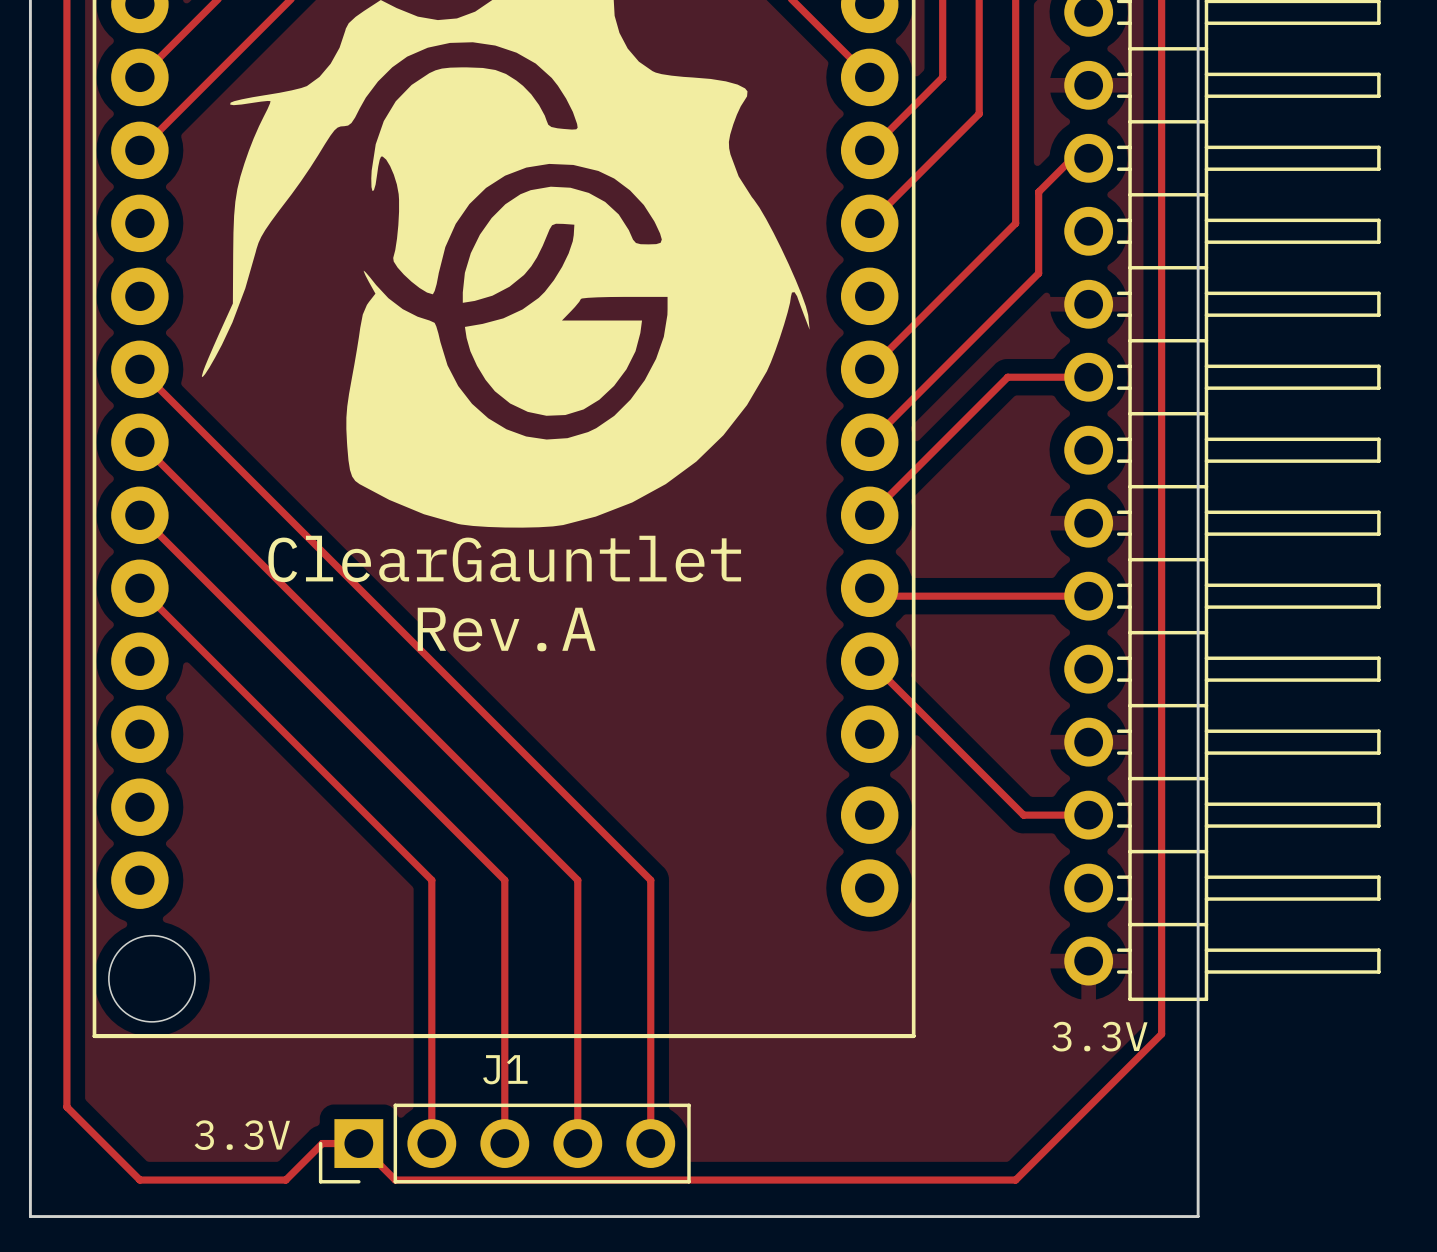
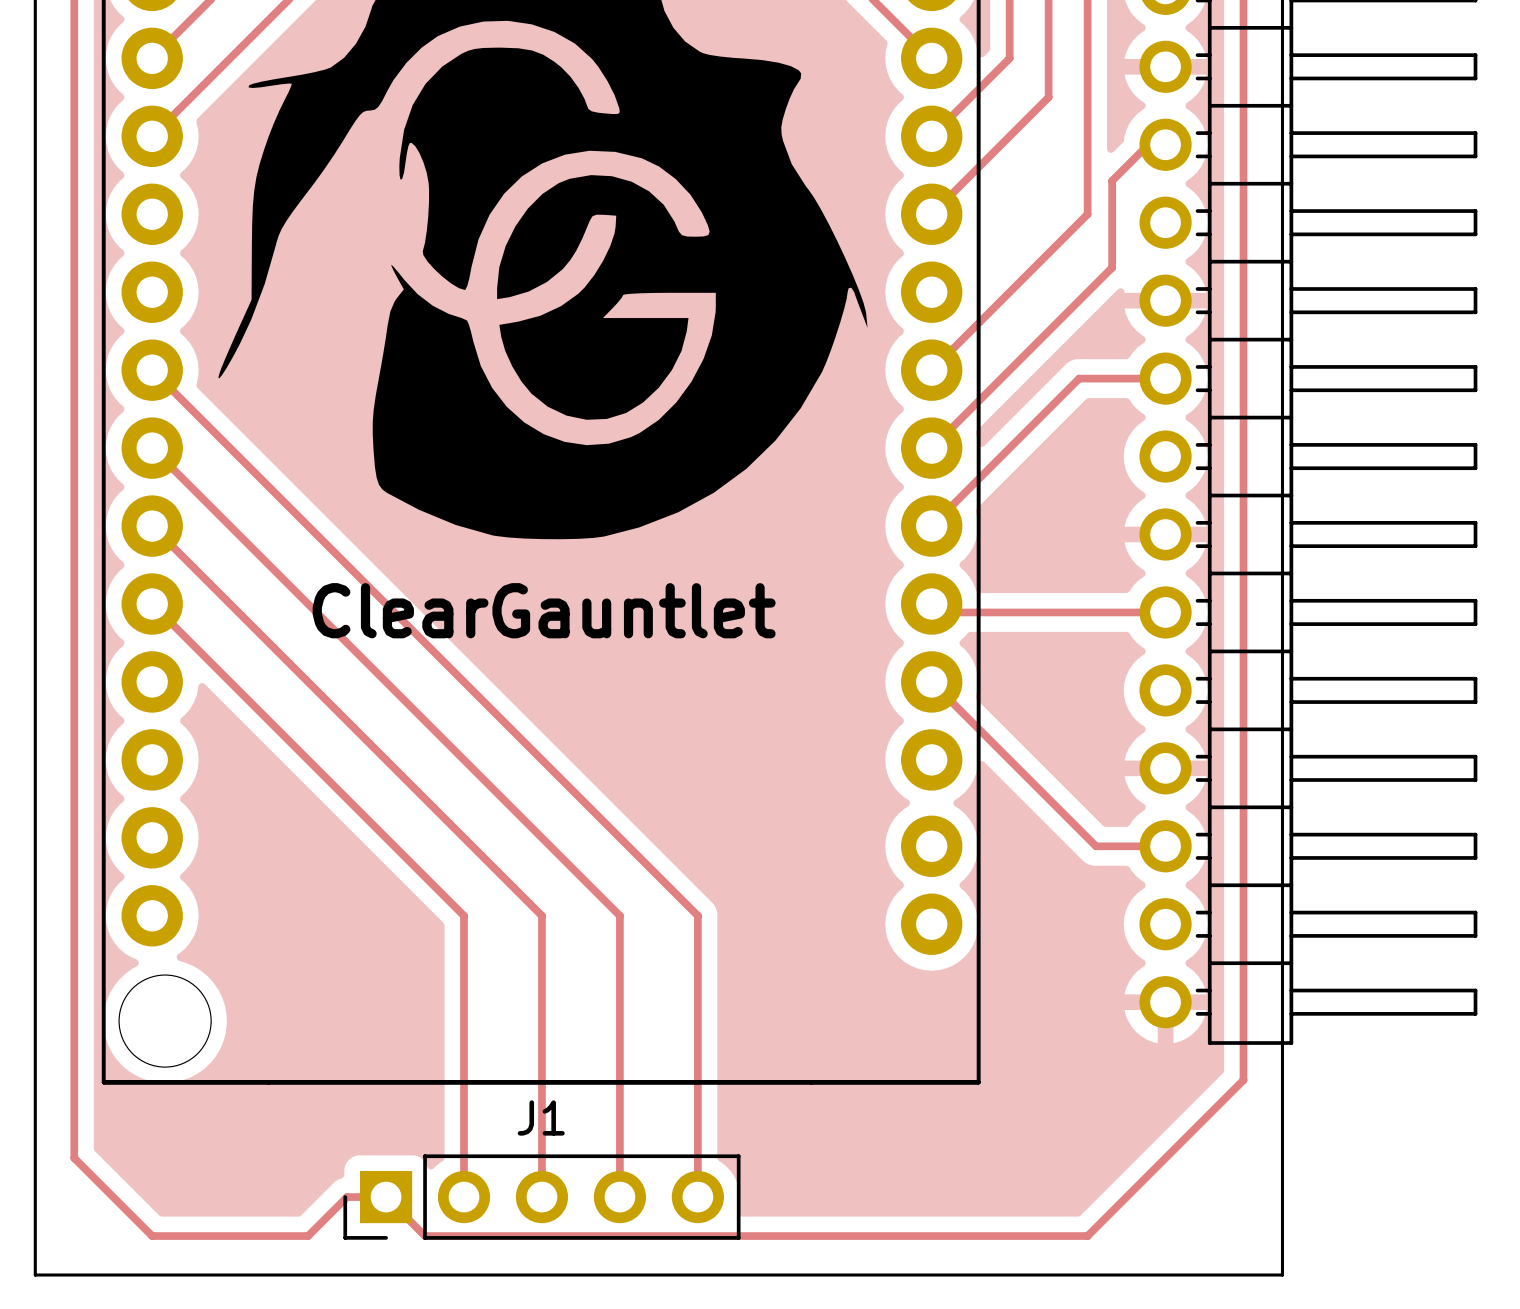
text position: ClearGauntlet (504, 558) -> ClearGauntlet (544, 610)
text: Rev.A (506, 629) -> none
text: 3.3V (1099, 1036) -> none
text: 3.3V (242, 1135) -> none

